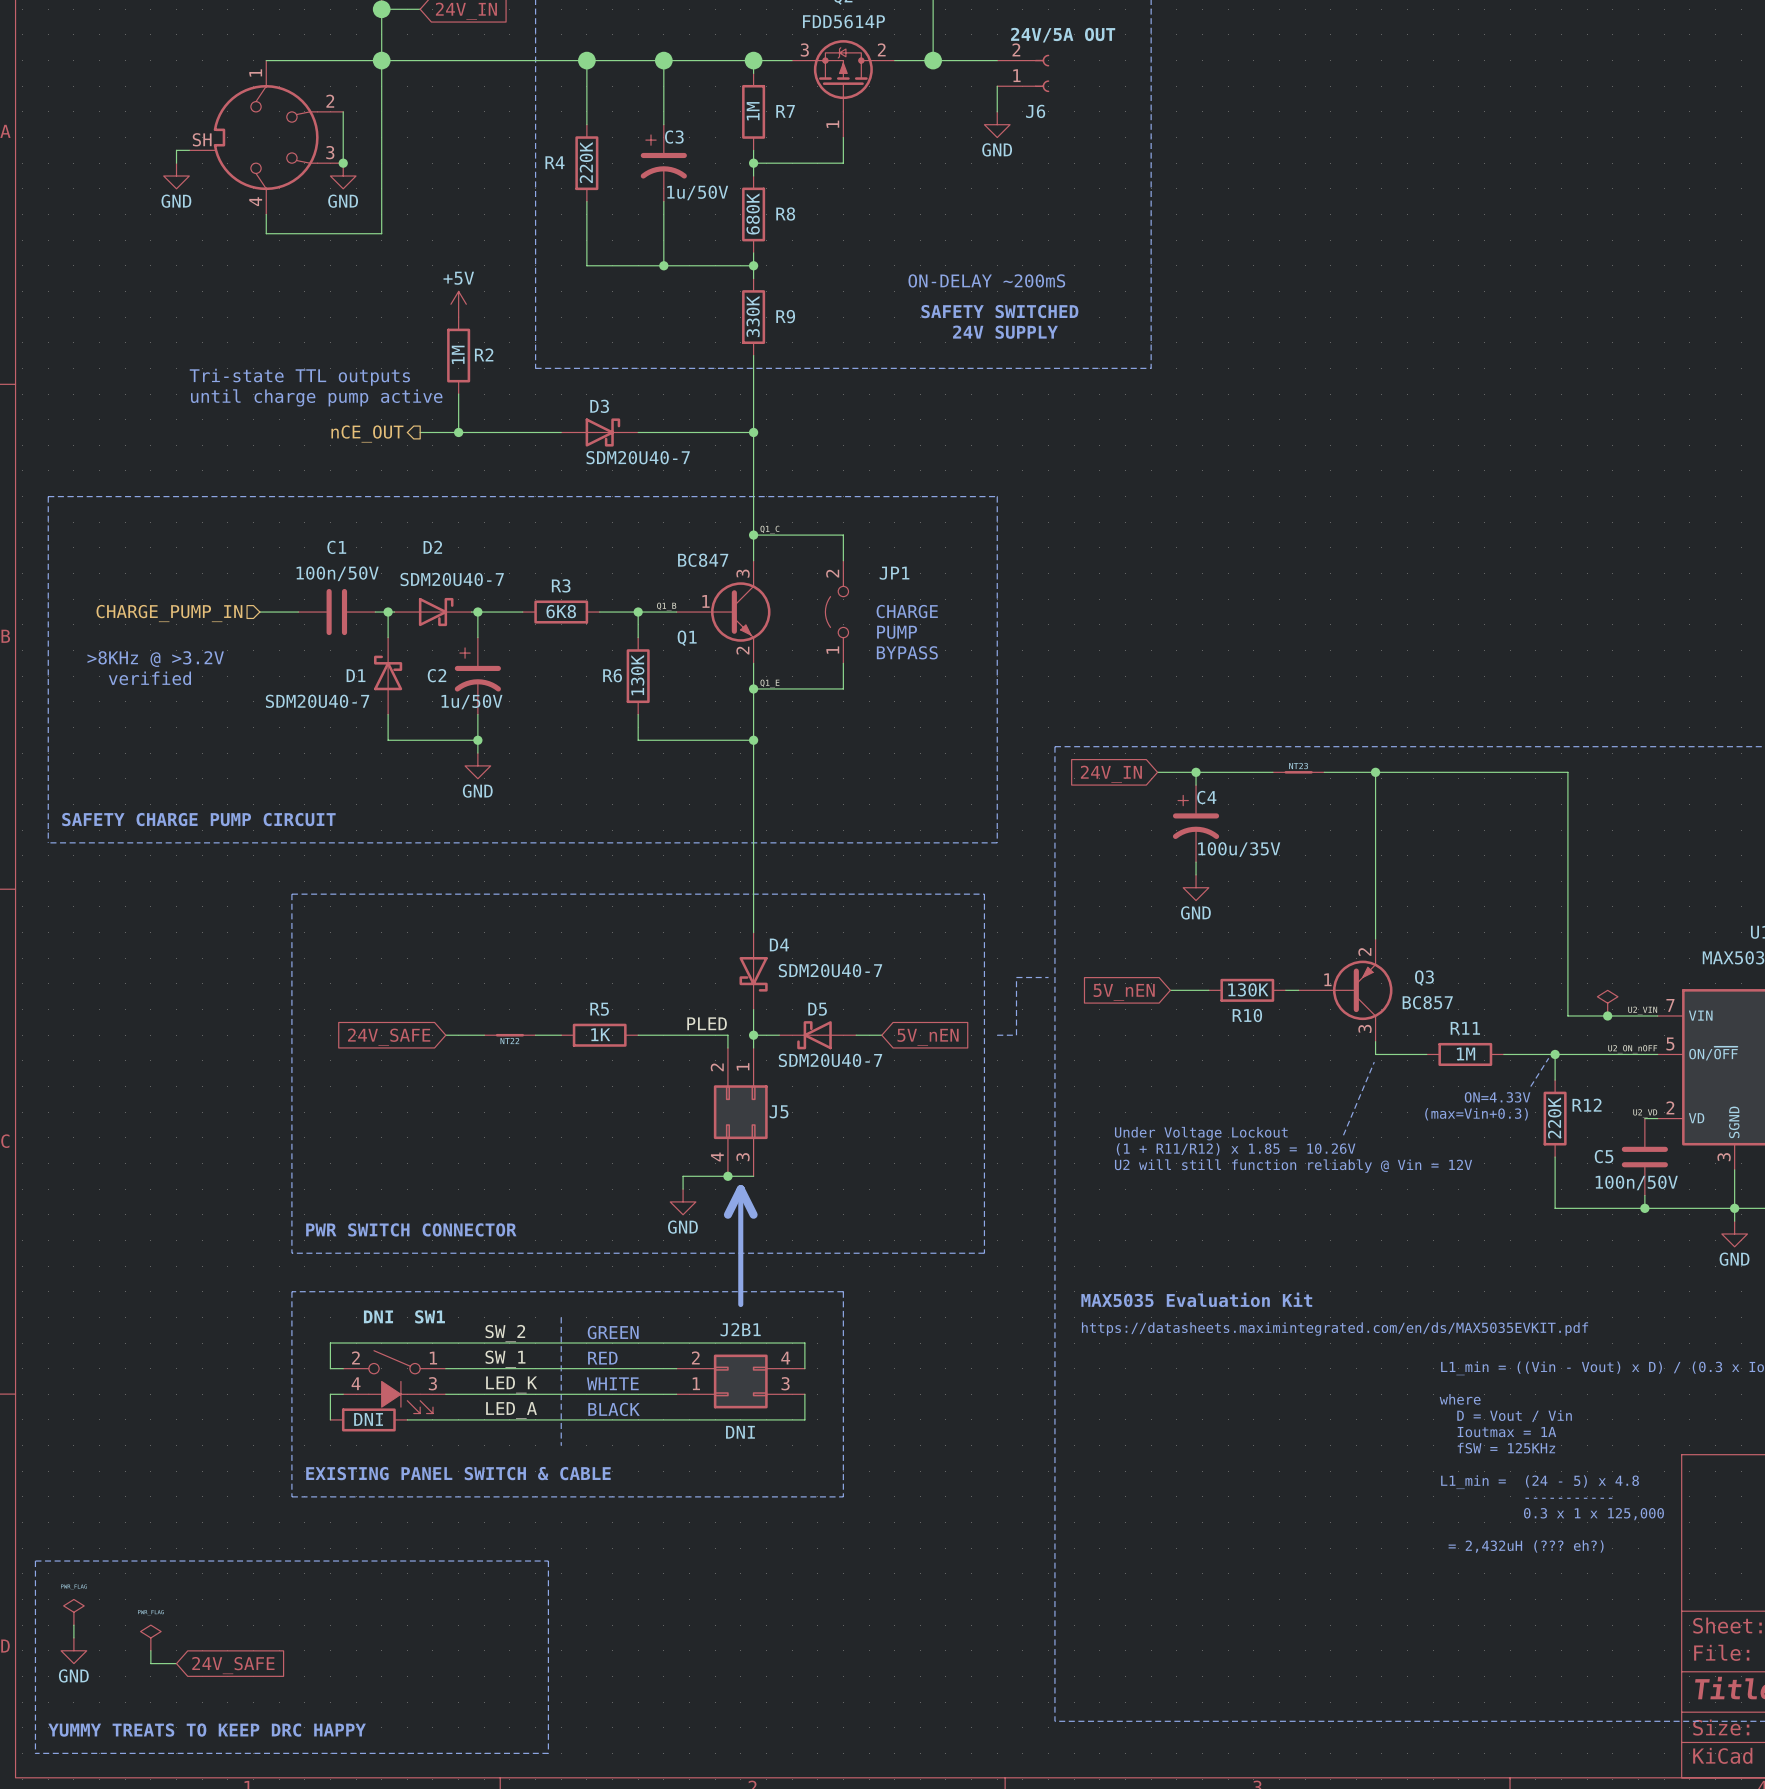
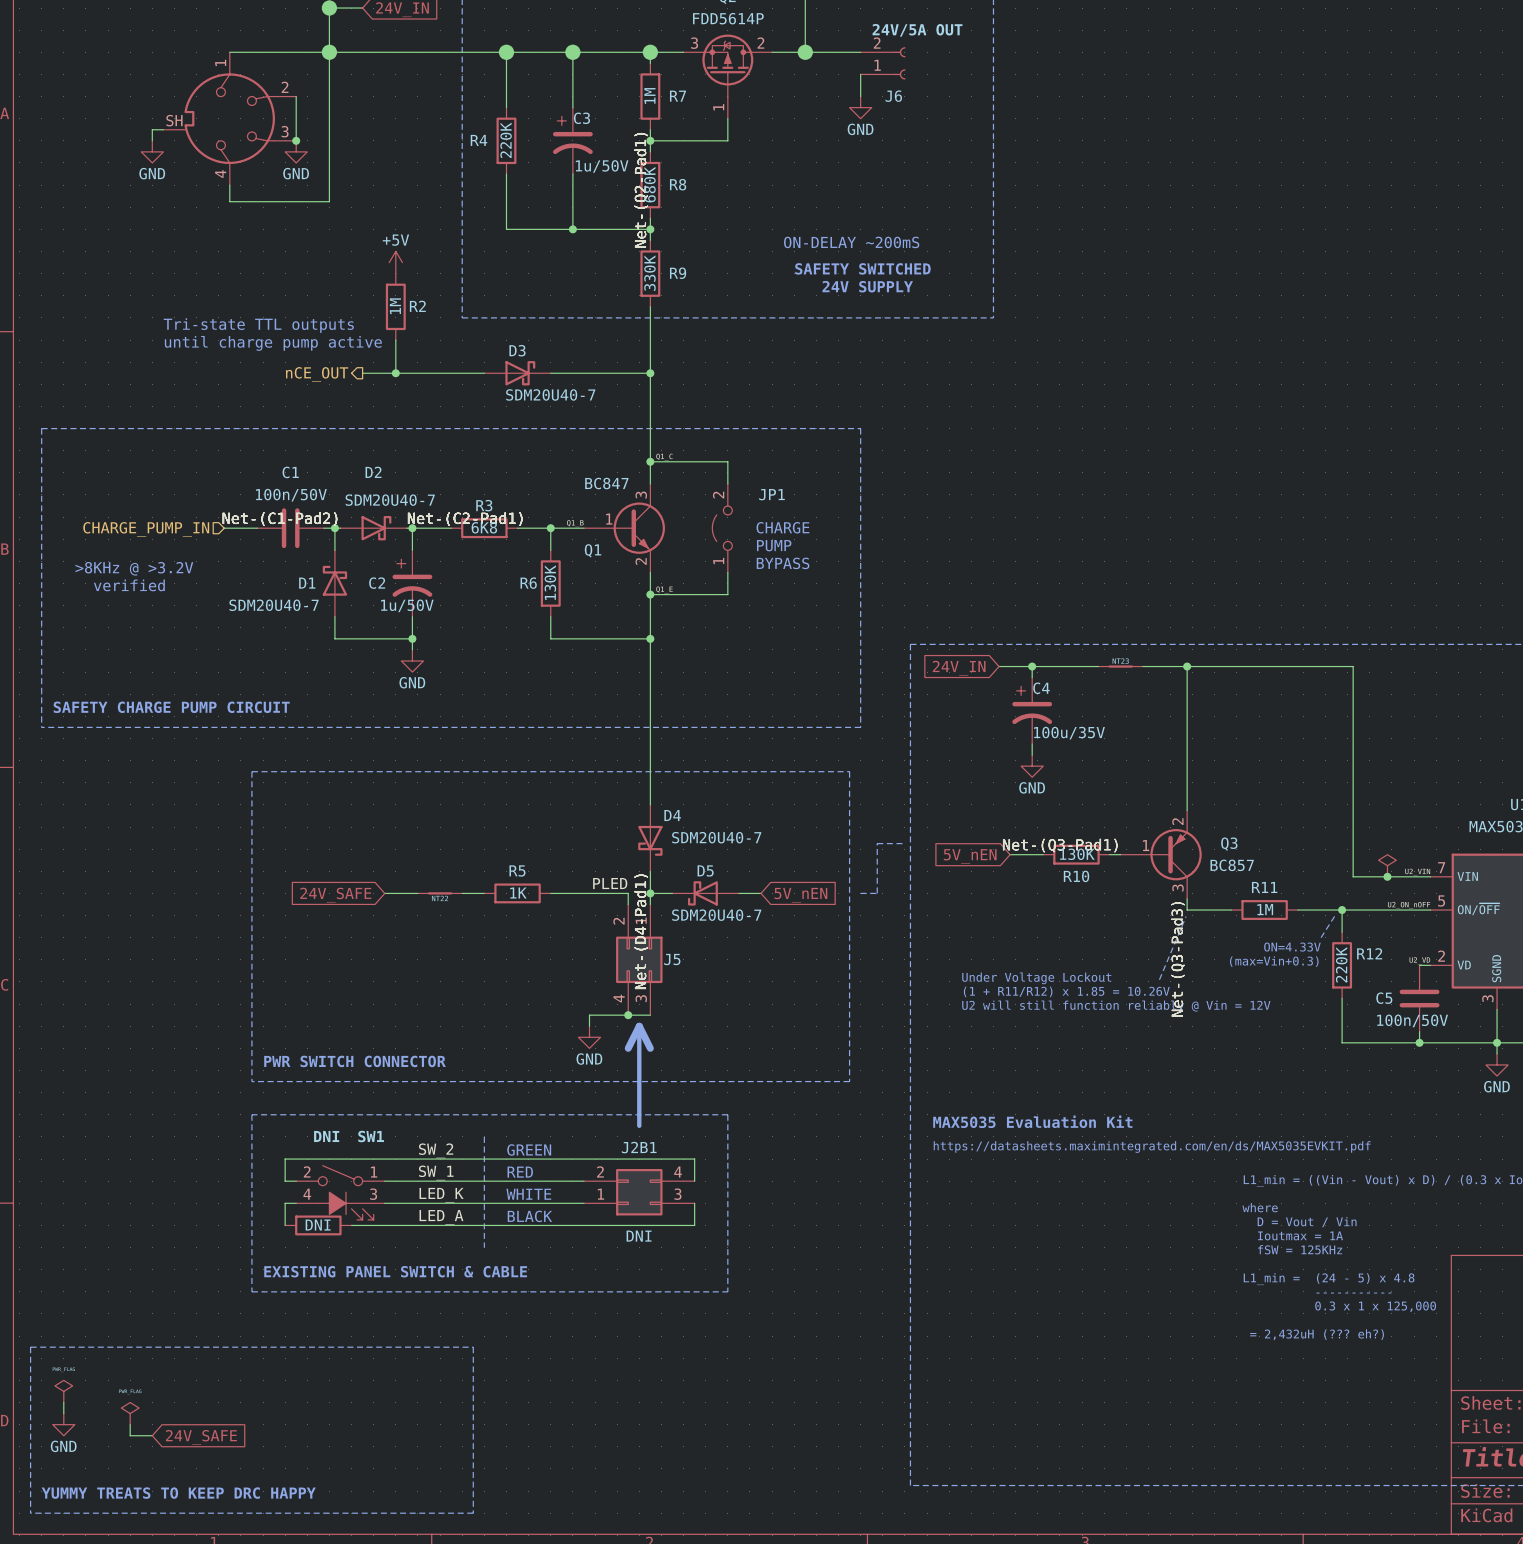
label: none -> Net-(Q2-Pad1) (641, 190)
label: none -> Net-(C1-Pad2) (280, 519)
label: none -> Net-(C2-Pad1) (465, 519)
label: none -> Net-(Q3-Pad1) (1060, 845)
label: none -> Net-(D4-Pad1) (641, 931)
label: none -> Net-(Q3-Pad3) (1178, 959)

